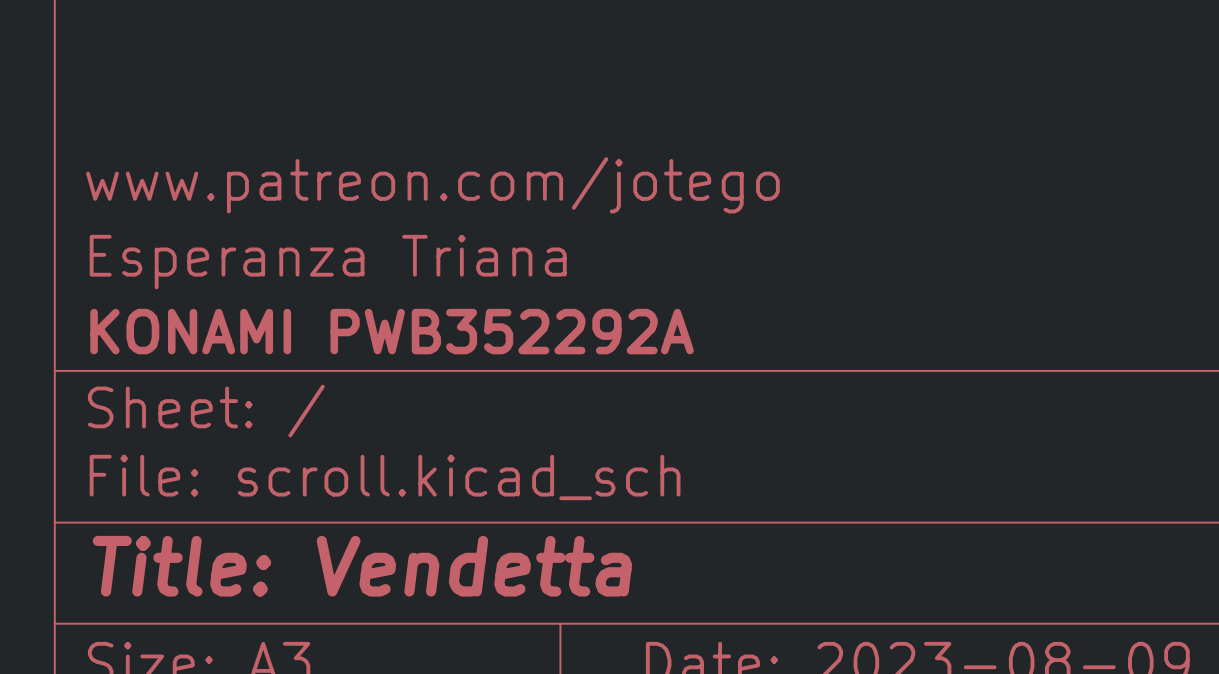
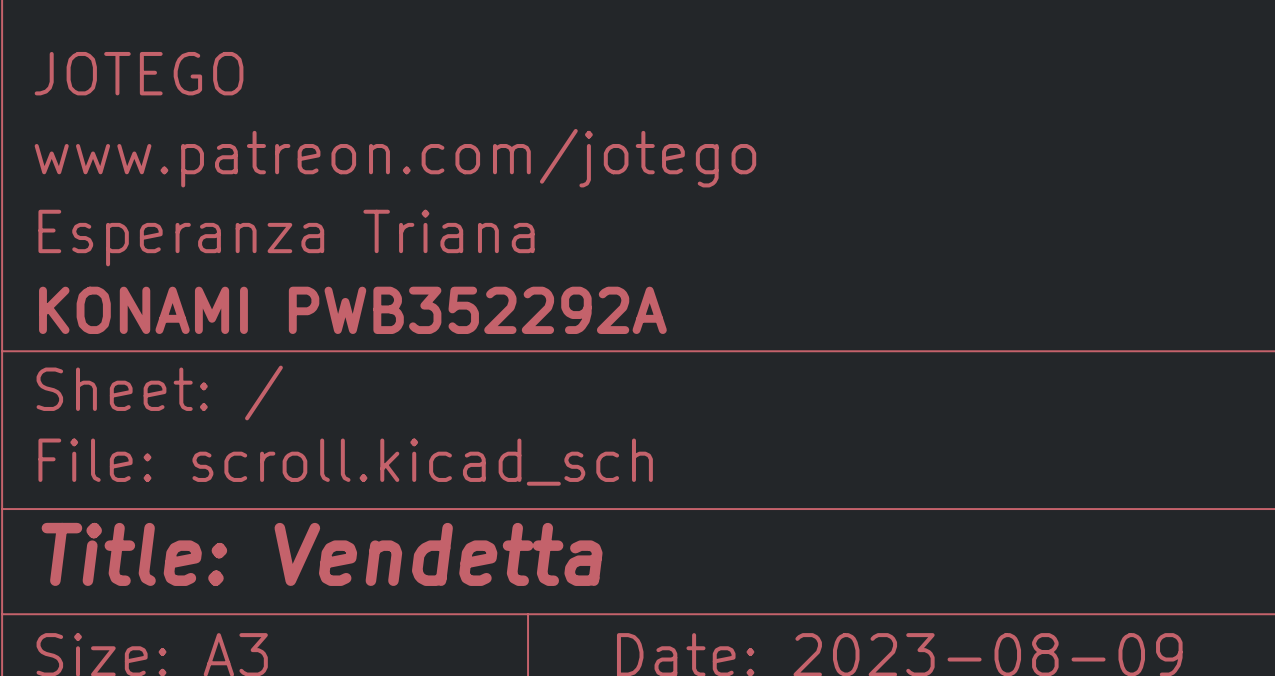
title block: none -> JOTEGO (139, 73)

